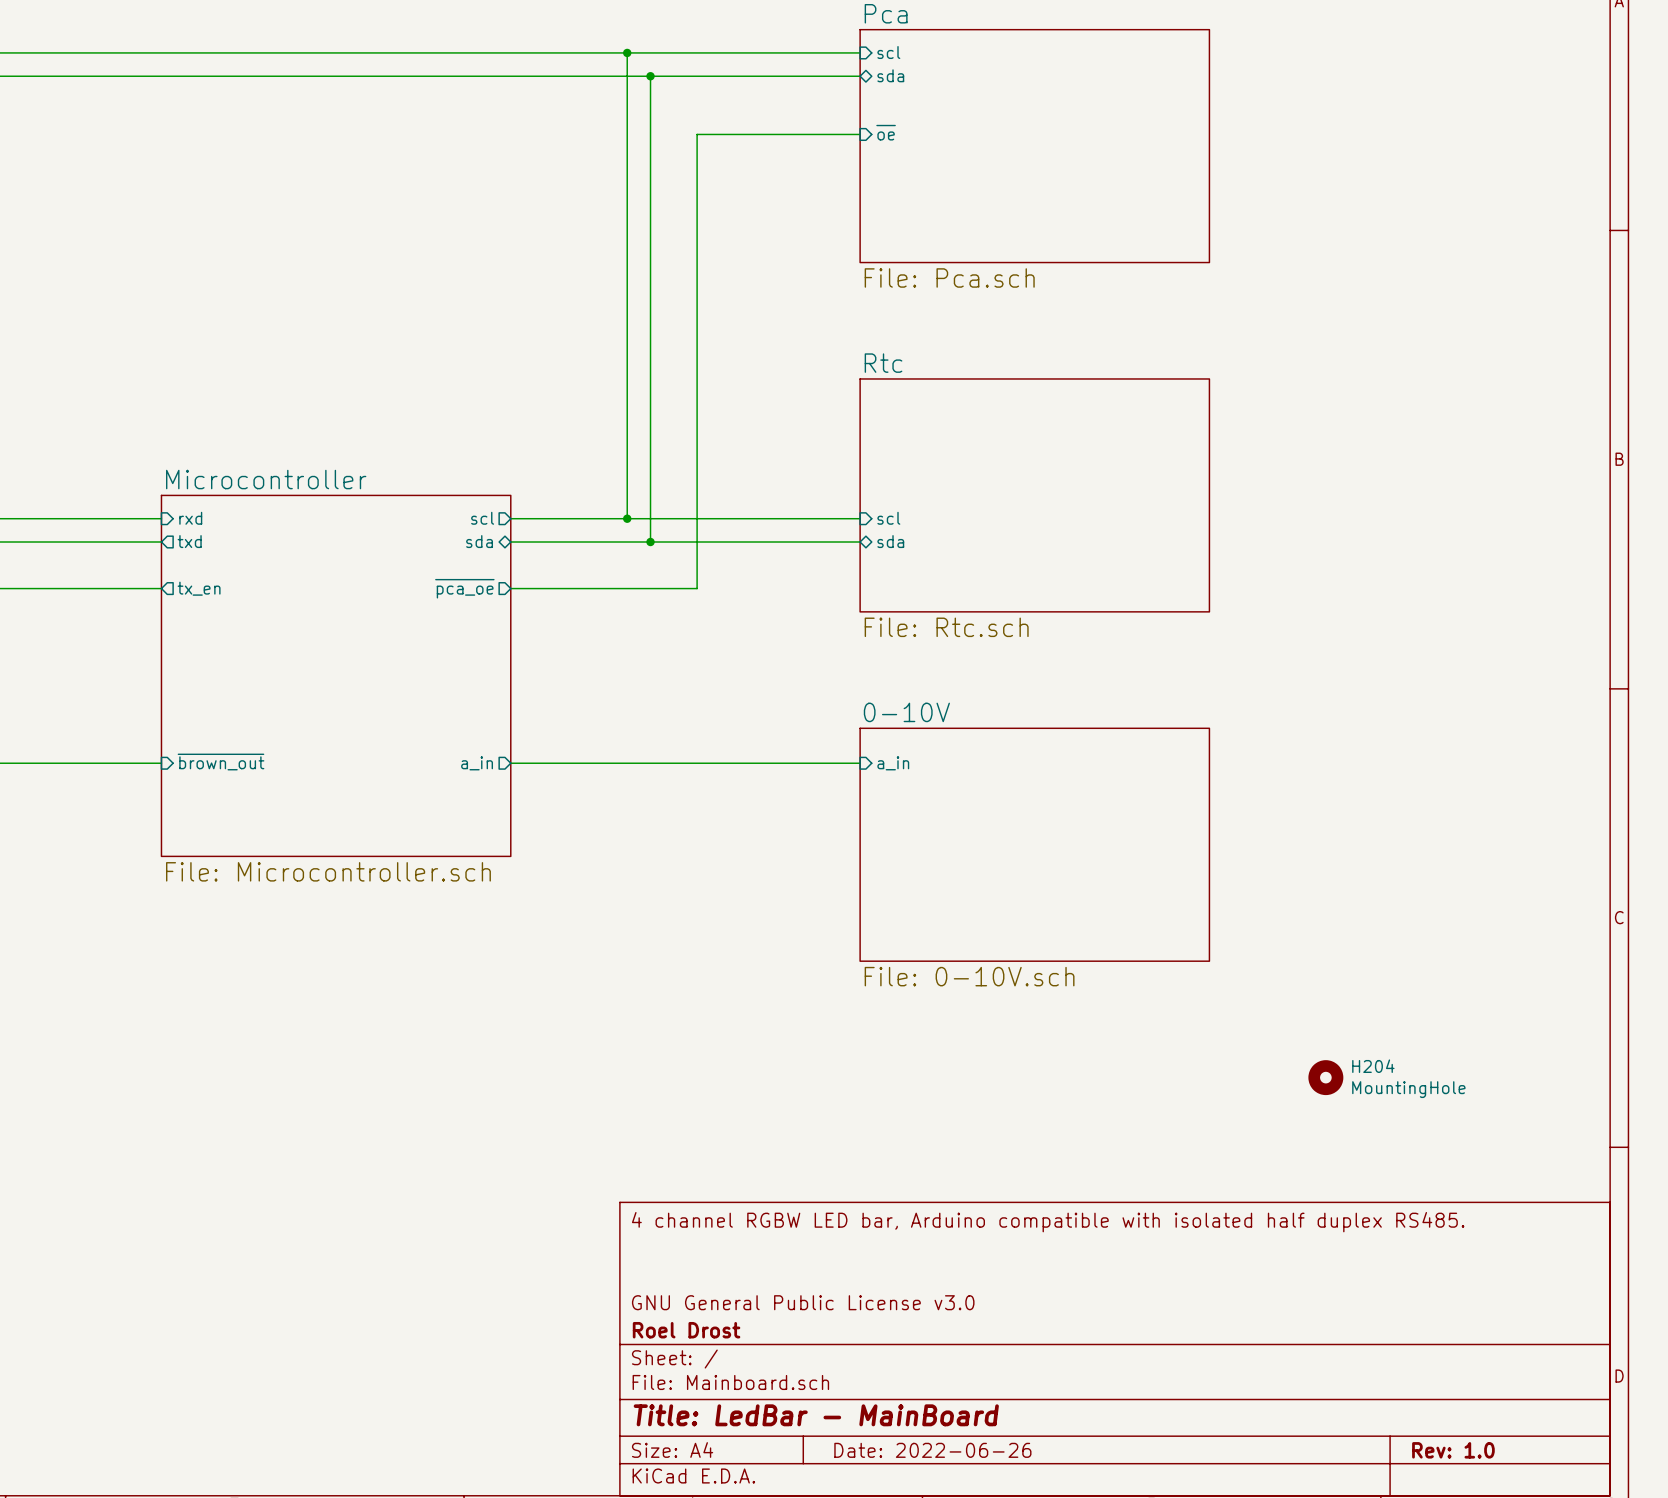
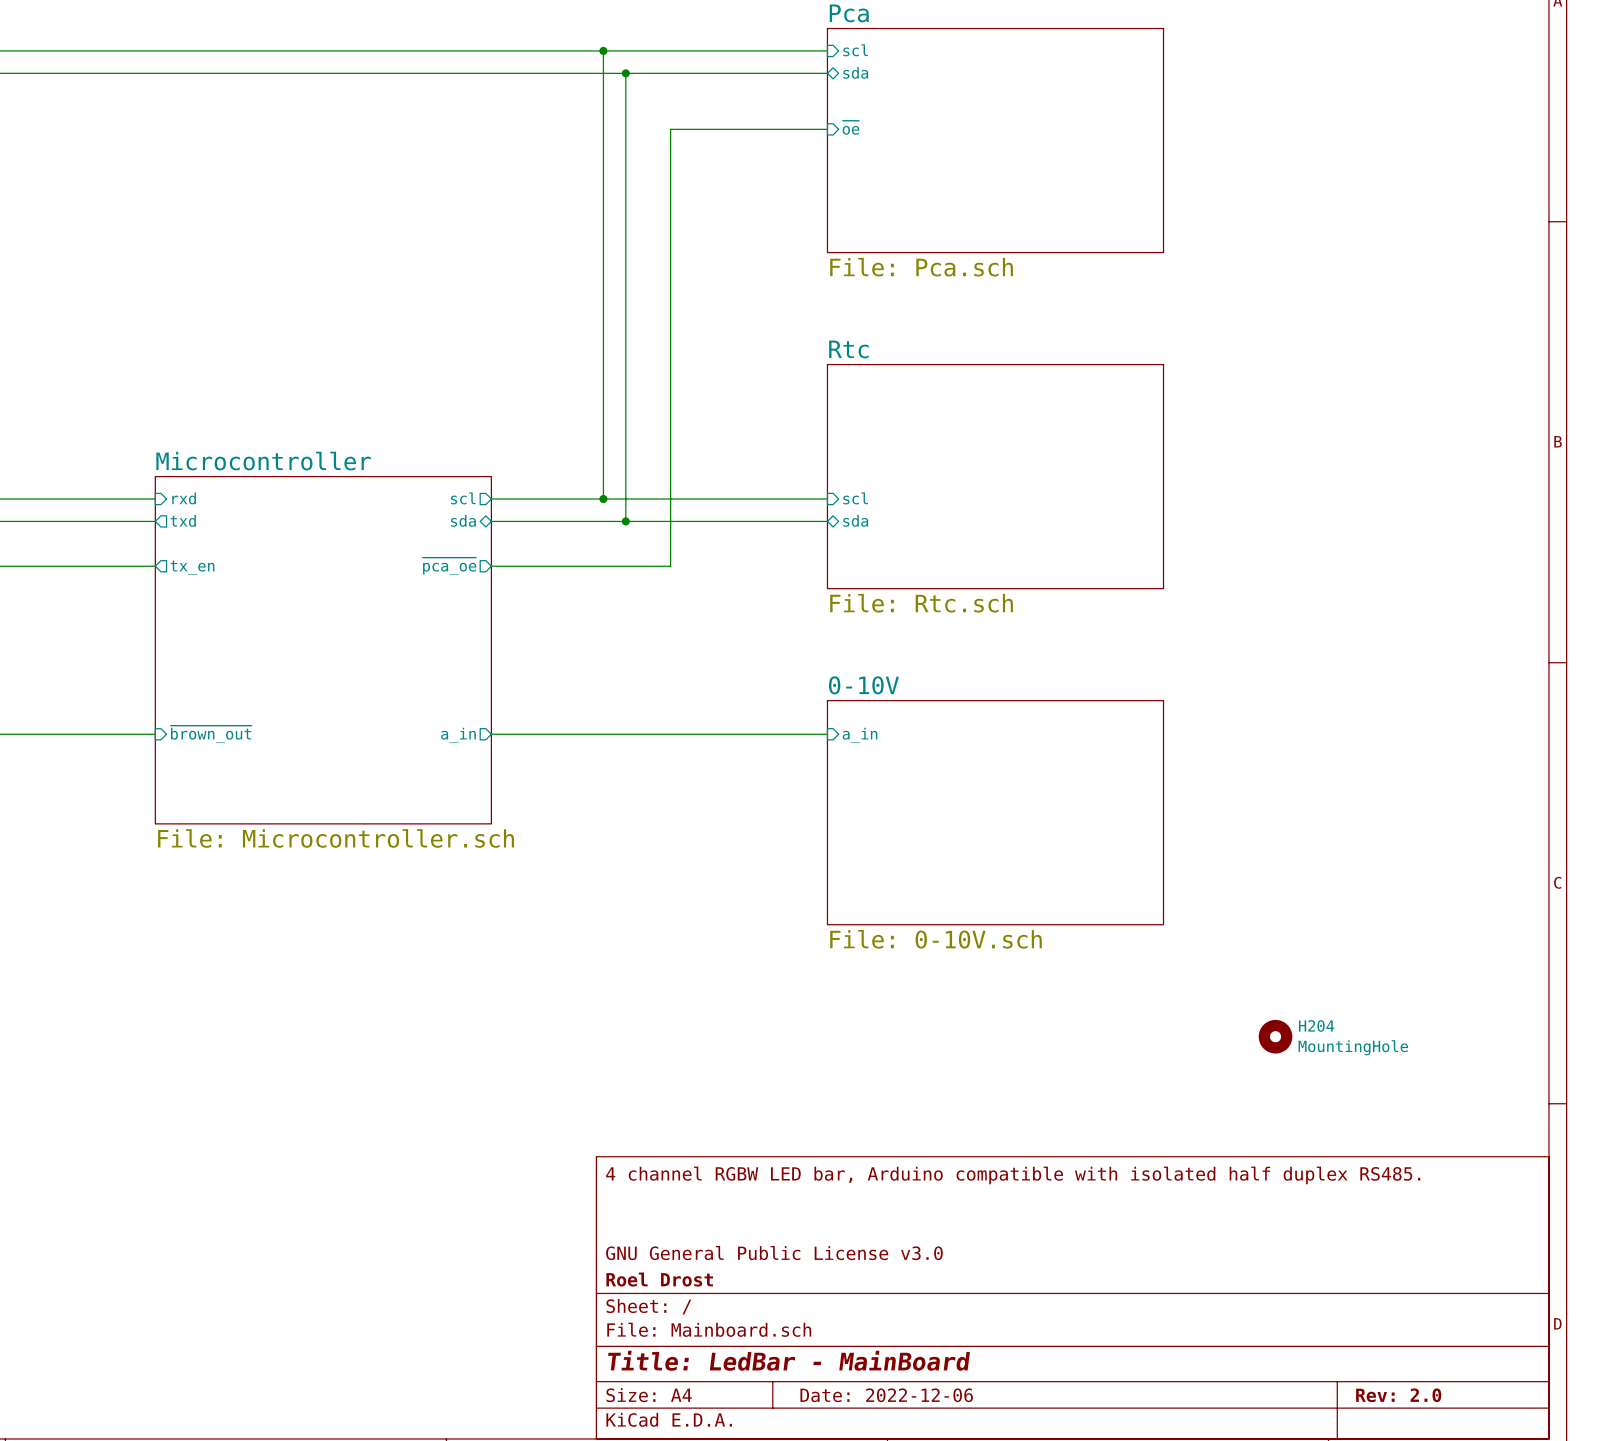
title block: Date: 2022-06-26 (932, 1450) -> Date: 2022-12-06 (886, 1395)
title block: Rev: 1.0 (1453, 1450) -> Rev: 2.0 (1398, 1395)

